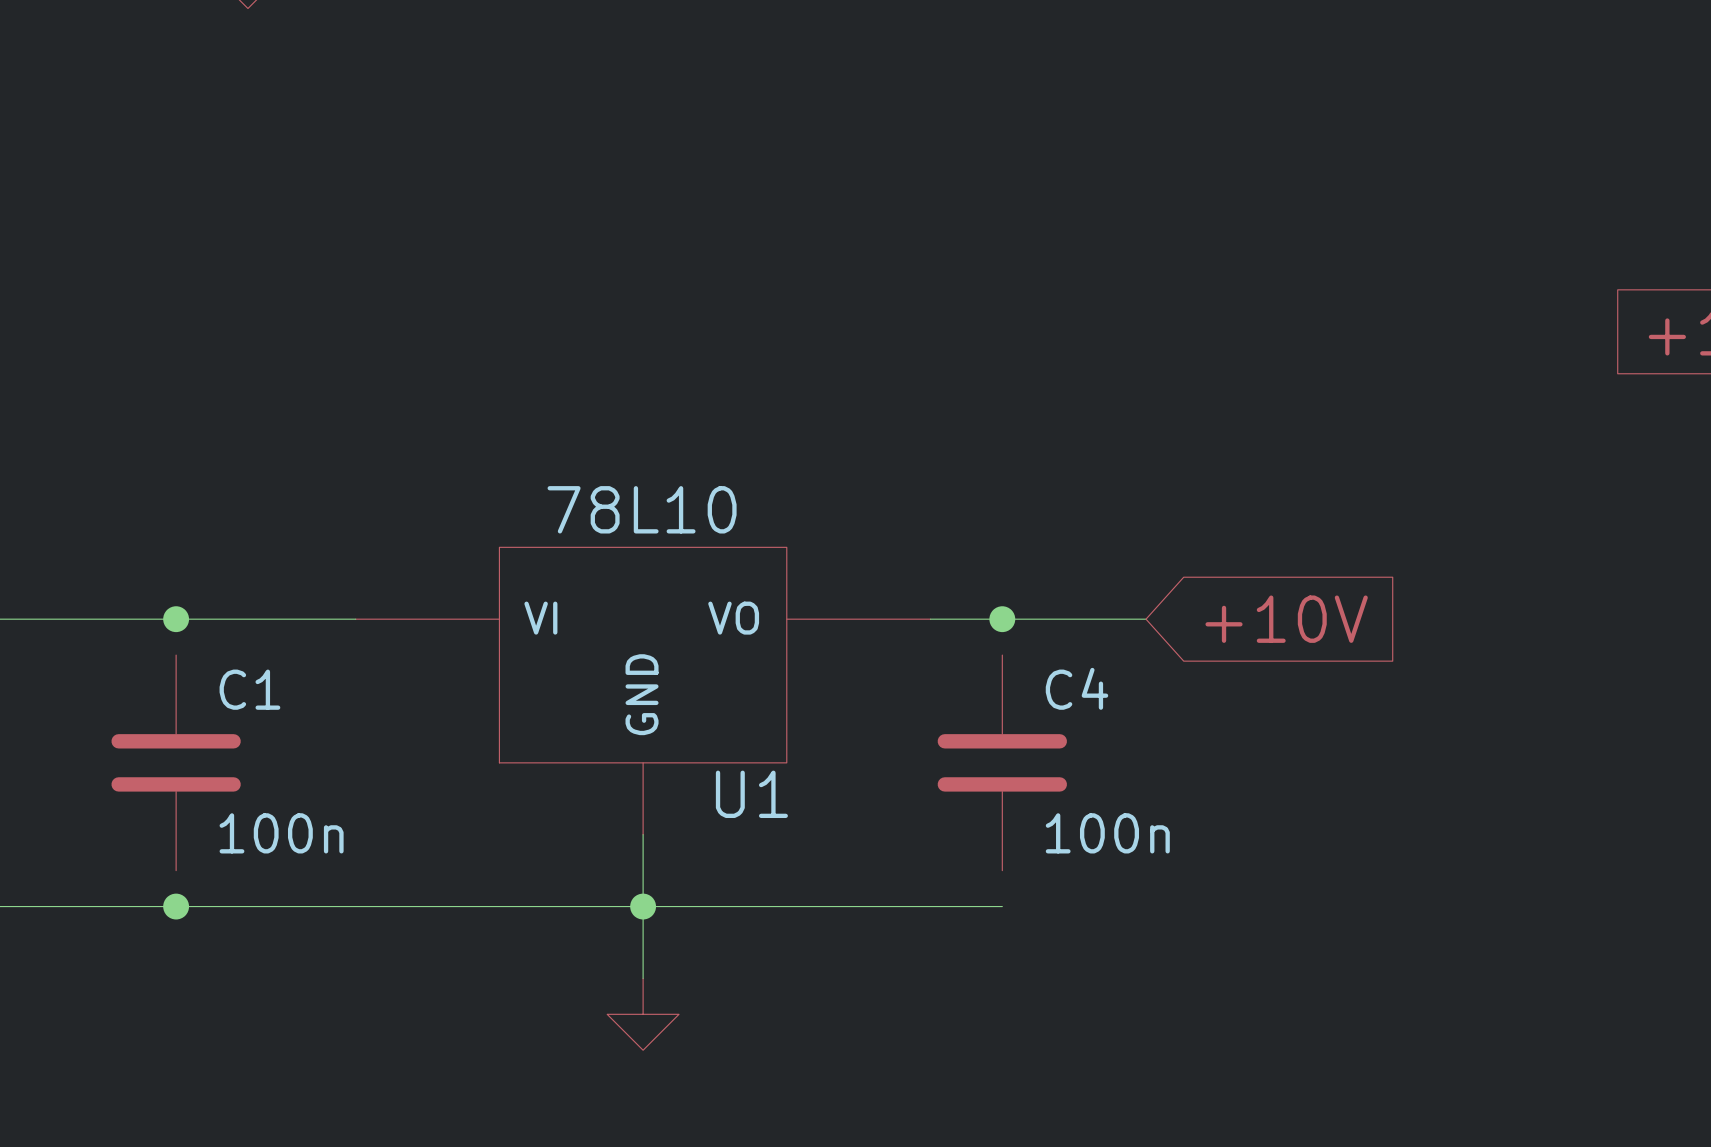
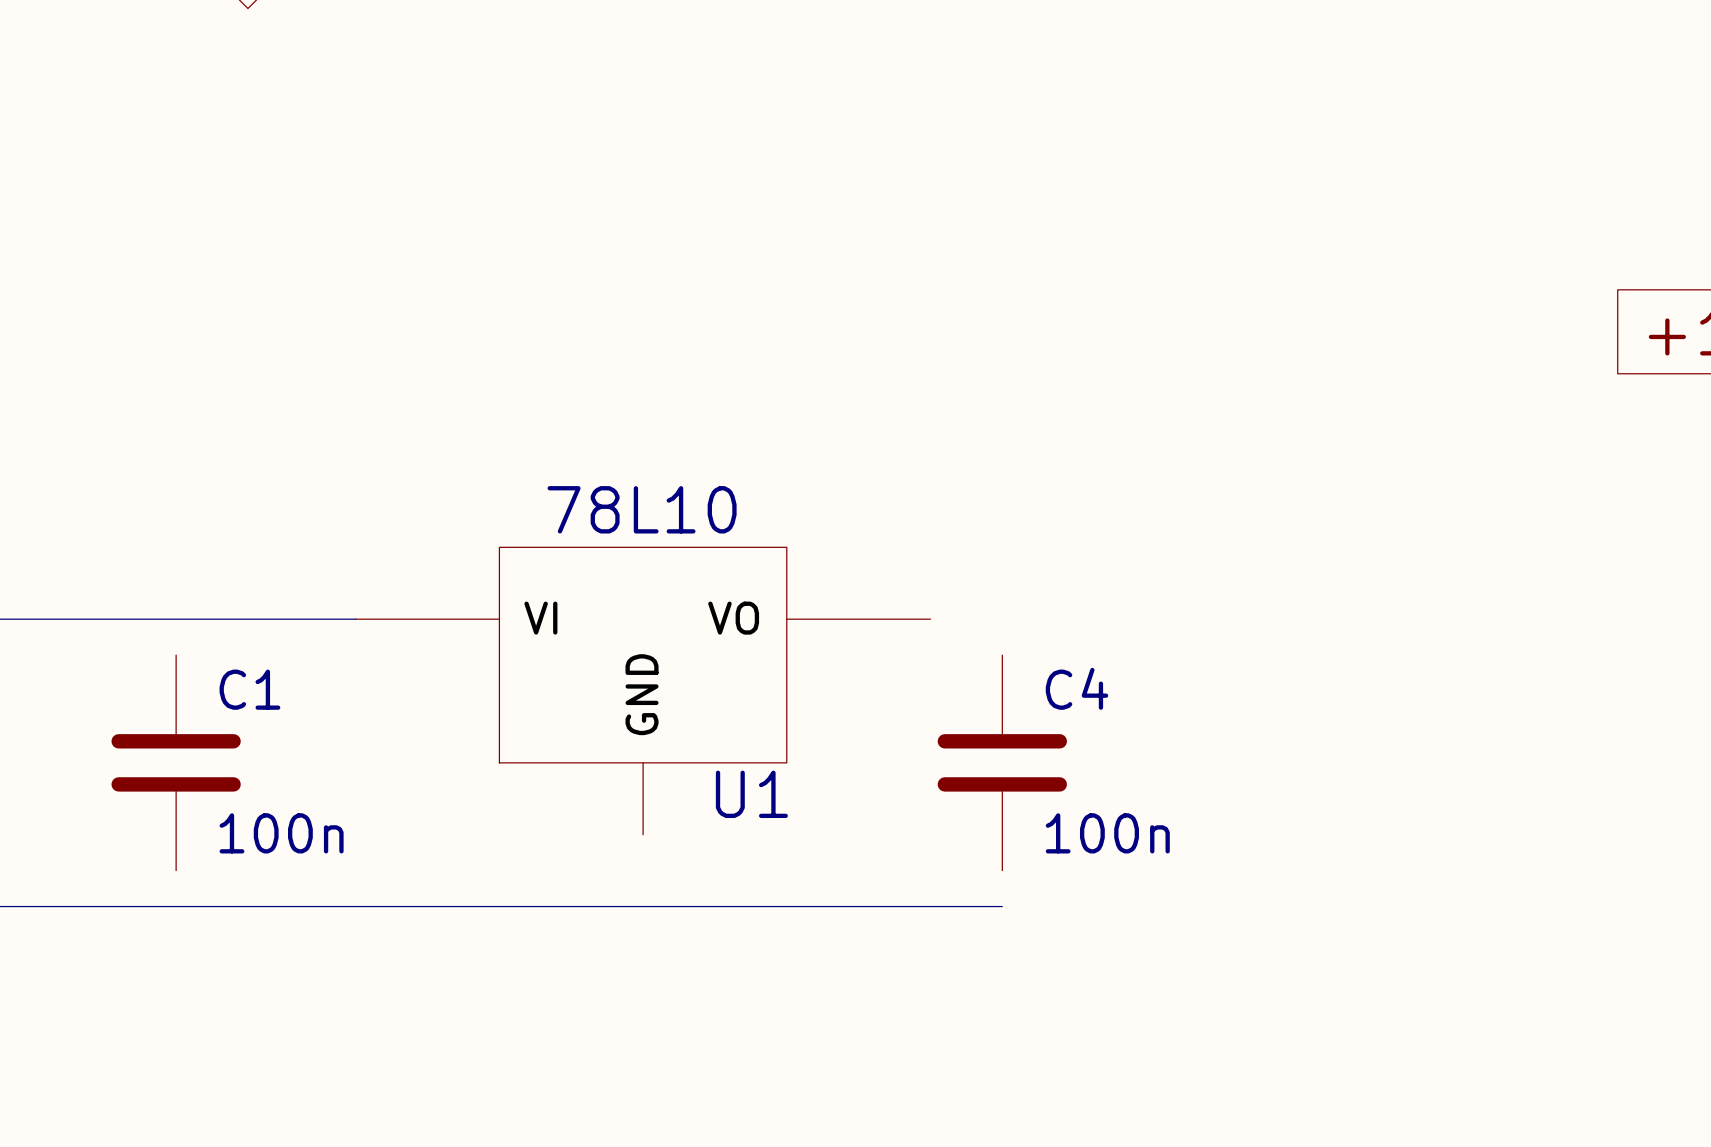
junction: (176, 619) -> none
wire: (930, 619) (1146, 619) -> none
junction: (1002, 619) -> none
global label: +10V (1286, 619) -> none
wire: (643, 834) (643, 978) -> none
junction: (176, 906) -> none
junction: (643, 906) -> none
power symbol: (643, 1014) -> none

